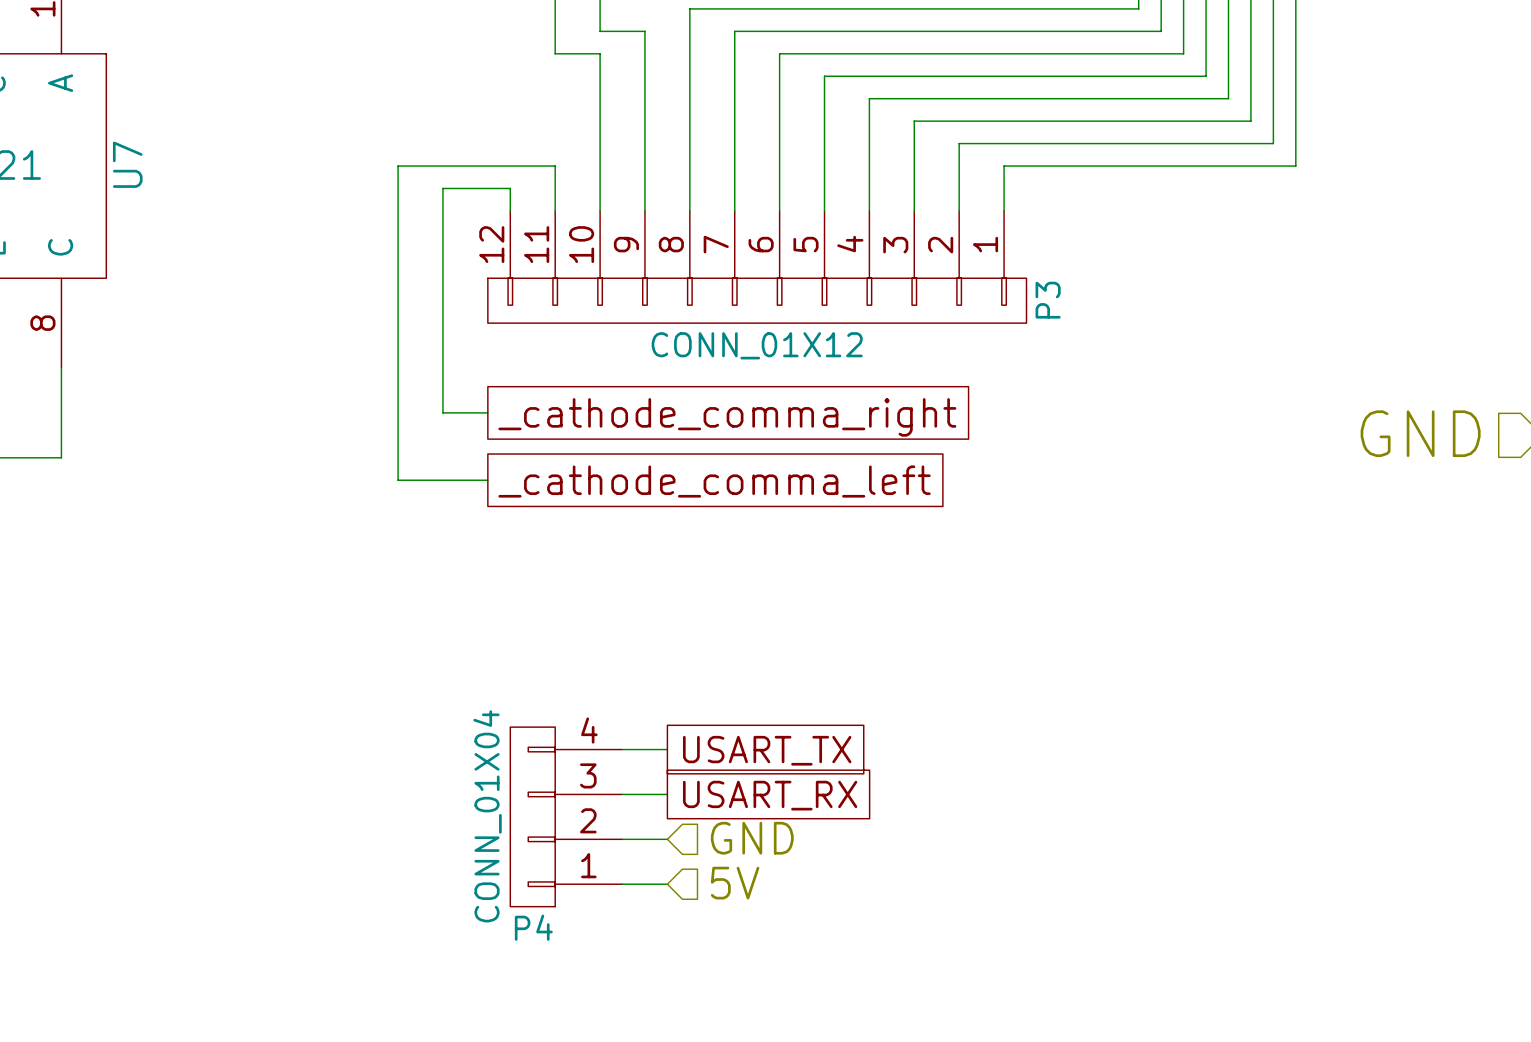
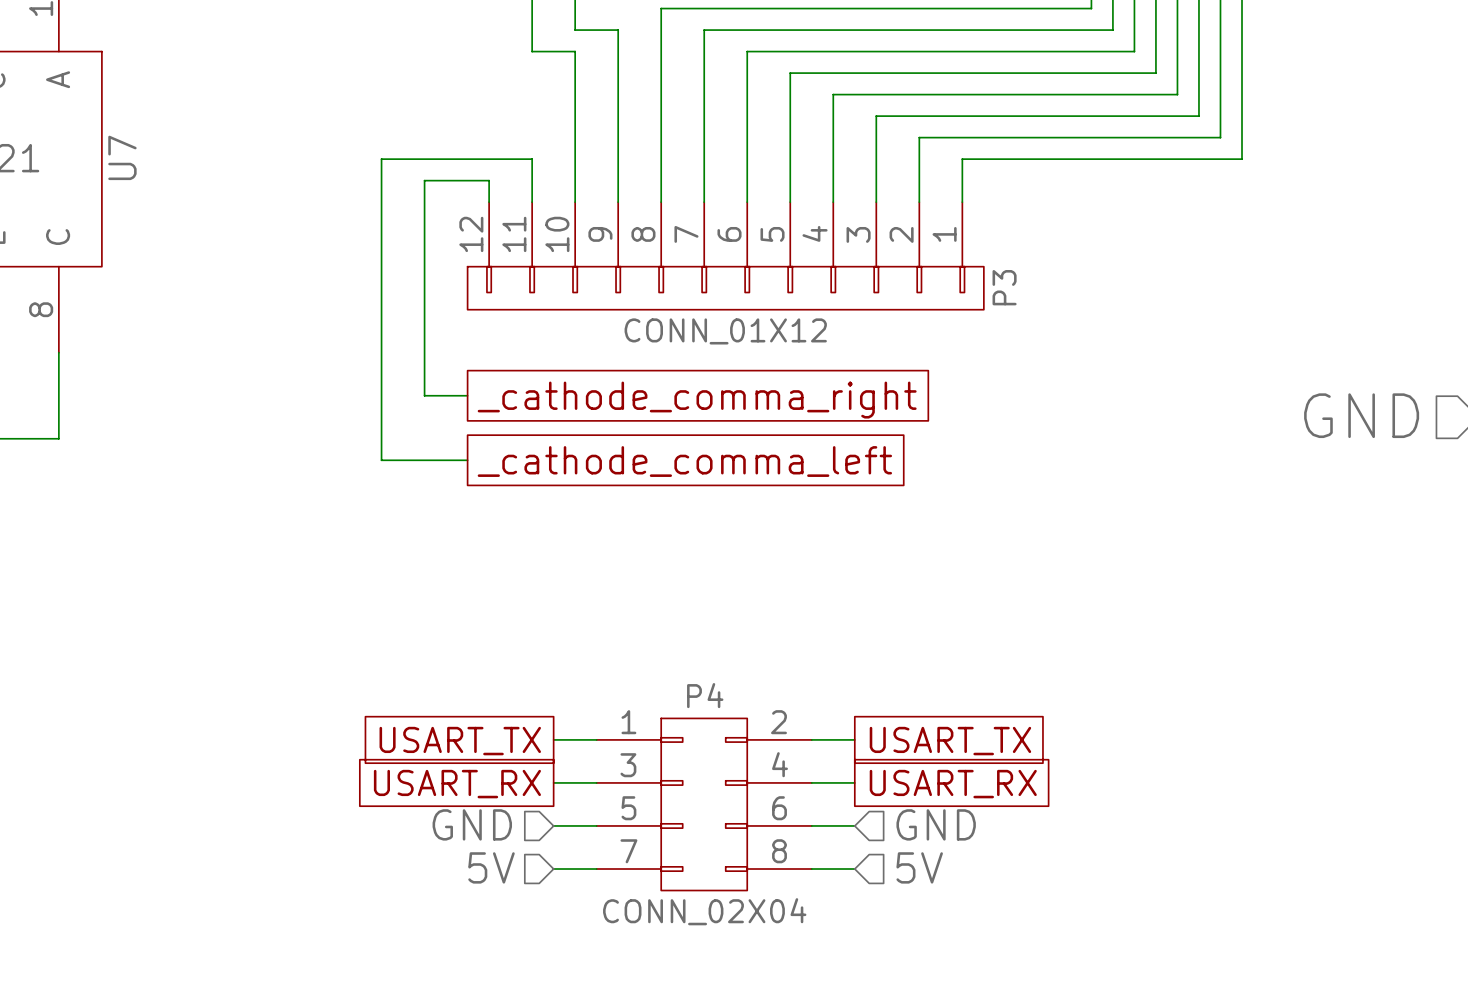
P4 symbol: [510, 727, 623, 907] -> [596, 718, 812, 891]
wire: (622, 749) (667, 749) -> (553, 739) (596, 739)
global label rotation: 0° (767, 750) -> 180° (460, 741)
global label position: USART_TX (767, 750) -> USART_TX (460, 741)
wire: none -> (811, 739) (854, 739)
global label: none -> USART_TX (950, 741)
wire: (622, 794) (667, 794) -> (553, 782) (596, 782)
global label rotation: 0° (770, 795) -> 180° (457, 784)
global label position: USART_RX (770, 795) -> USART_RX (457, 784)
P4 value: CONN_01X04 (487, 816) -> CONN_02X04 (704, 911)
wire: none -> (811, 782) (854, 782)
global label: none -> USART_RX (953, 784)
hierarchical label: GND (752, 838) -> none
wire: (622, 839) (667, 839) -> (553, 825) (596, 825)
hierarchical label: none -> GND (472, 824)
hierarchical label: none -> GND (936, 824)
wire: none -> (811, 825) (854, 825)
hierarchical label: 5V (735, 883) -> none
wire: (622, 884) (667, 884) -> (553, 869) (596, 869)
hierarchical label: none -> 5V (491, 867)
hierarchical label: none -> 5V (919, 867)
wire: none -> (811, 869) (854, 869)
P4 name position: P4 (533, 927) -> P4 (705, 695)

